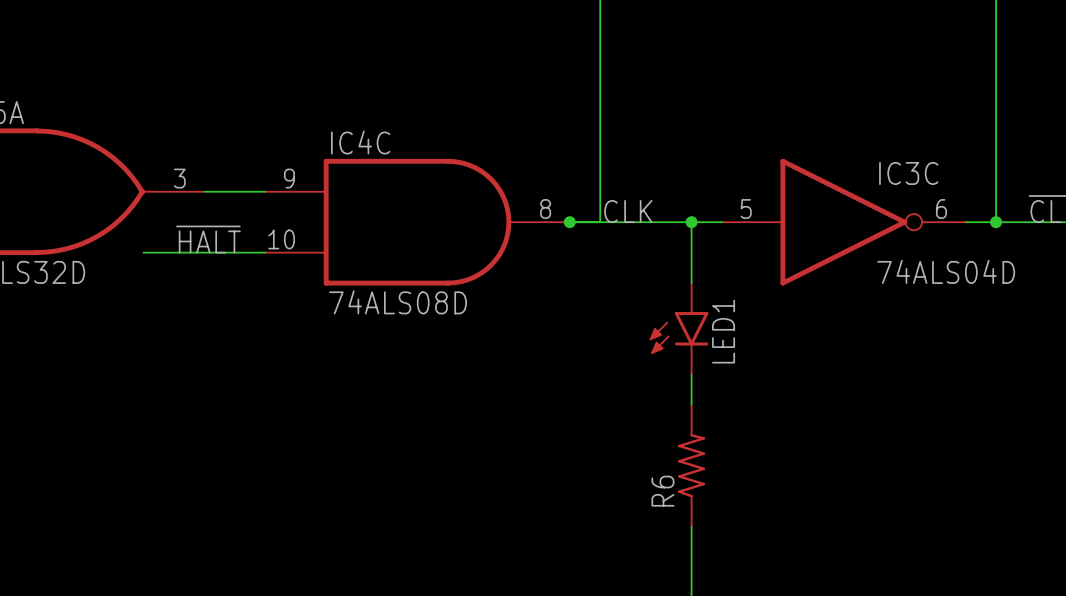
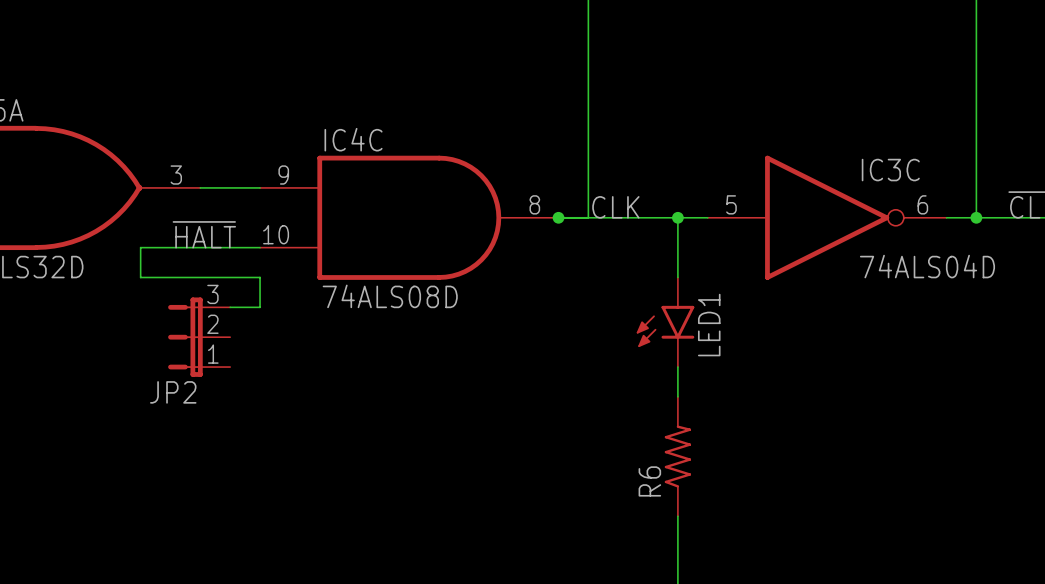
wire: none -> (140, 247) (140, 277) (260, 277) (260, 307) (230, 307)
JP2: none -> (199, 337)

